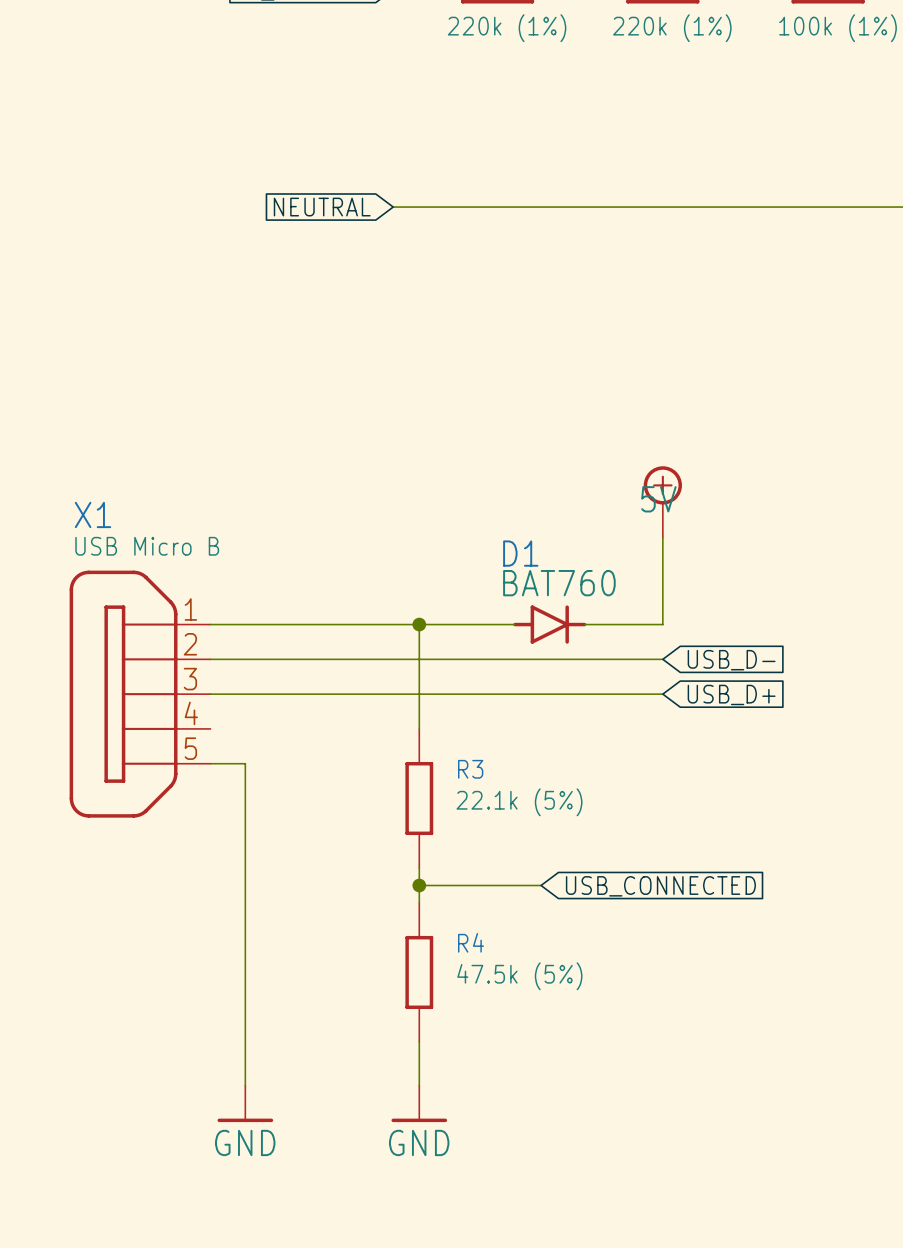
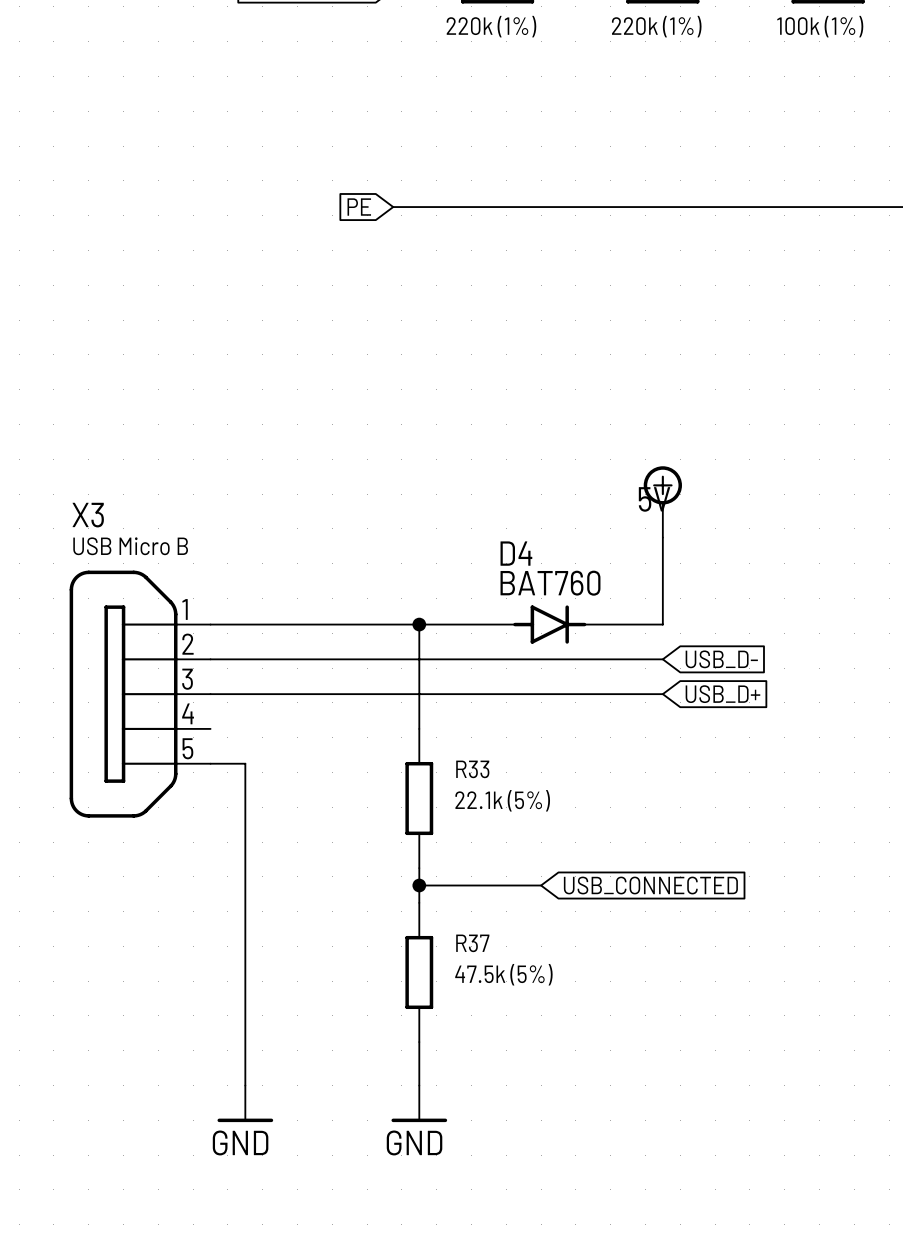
global label: NEUTRAL (322, 207) -> PE (359, 207)
X1 name: X1 (93, 514) -> X3 (88, 515)
D1 name: D1 (520, 553) -> D4 (516, 553)
R3 name: R3 (470, 769) -> R33 (472, 769)
R4 name: R4 (471, 942) -> R37 (472, 943)

